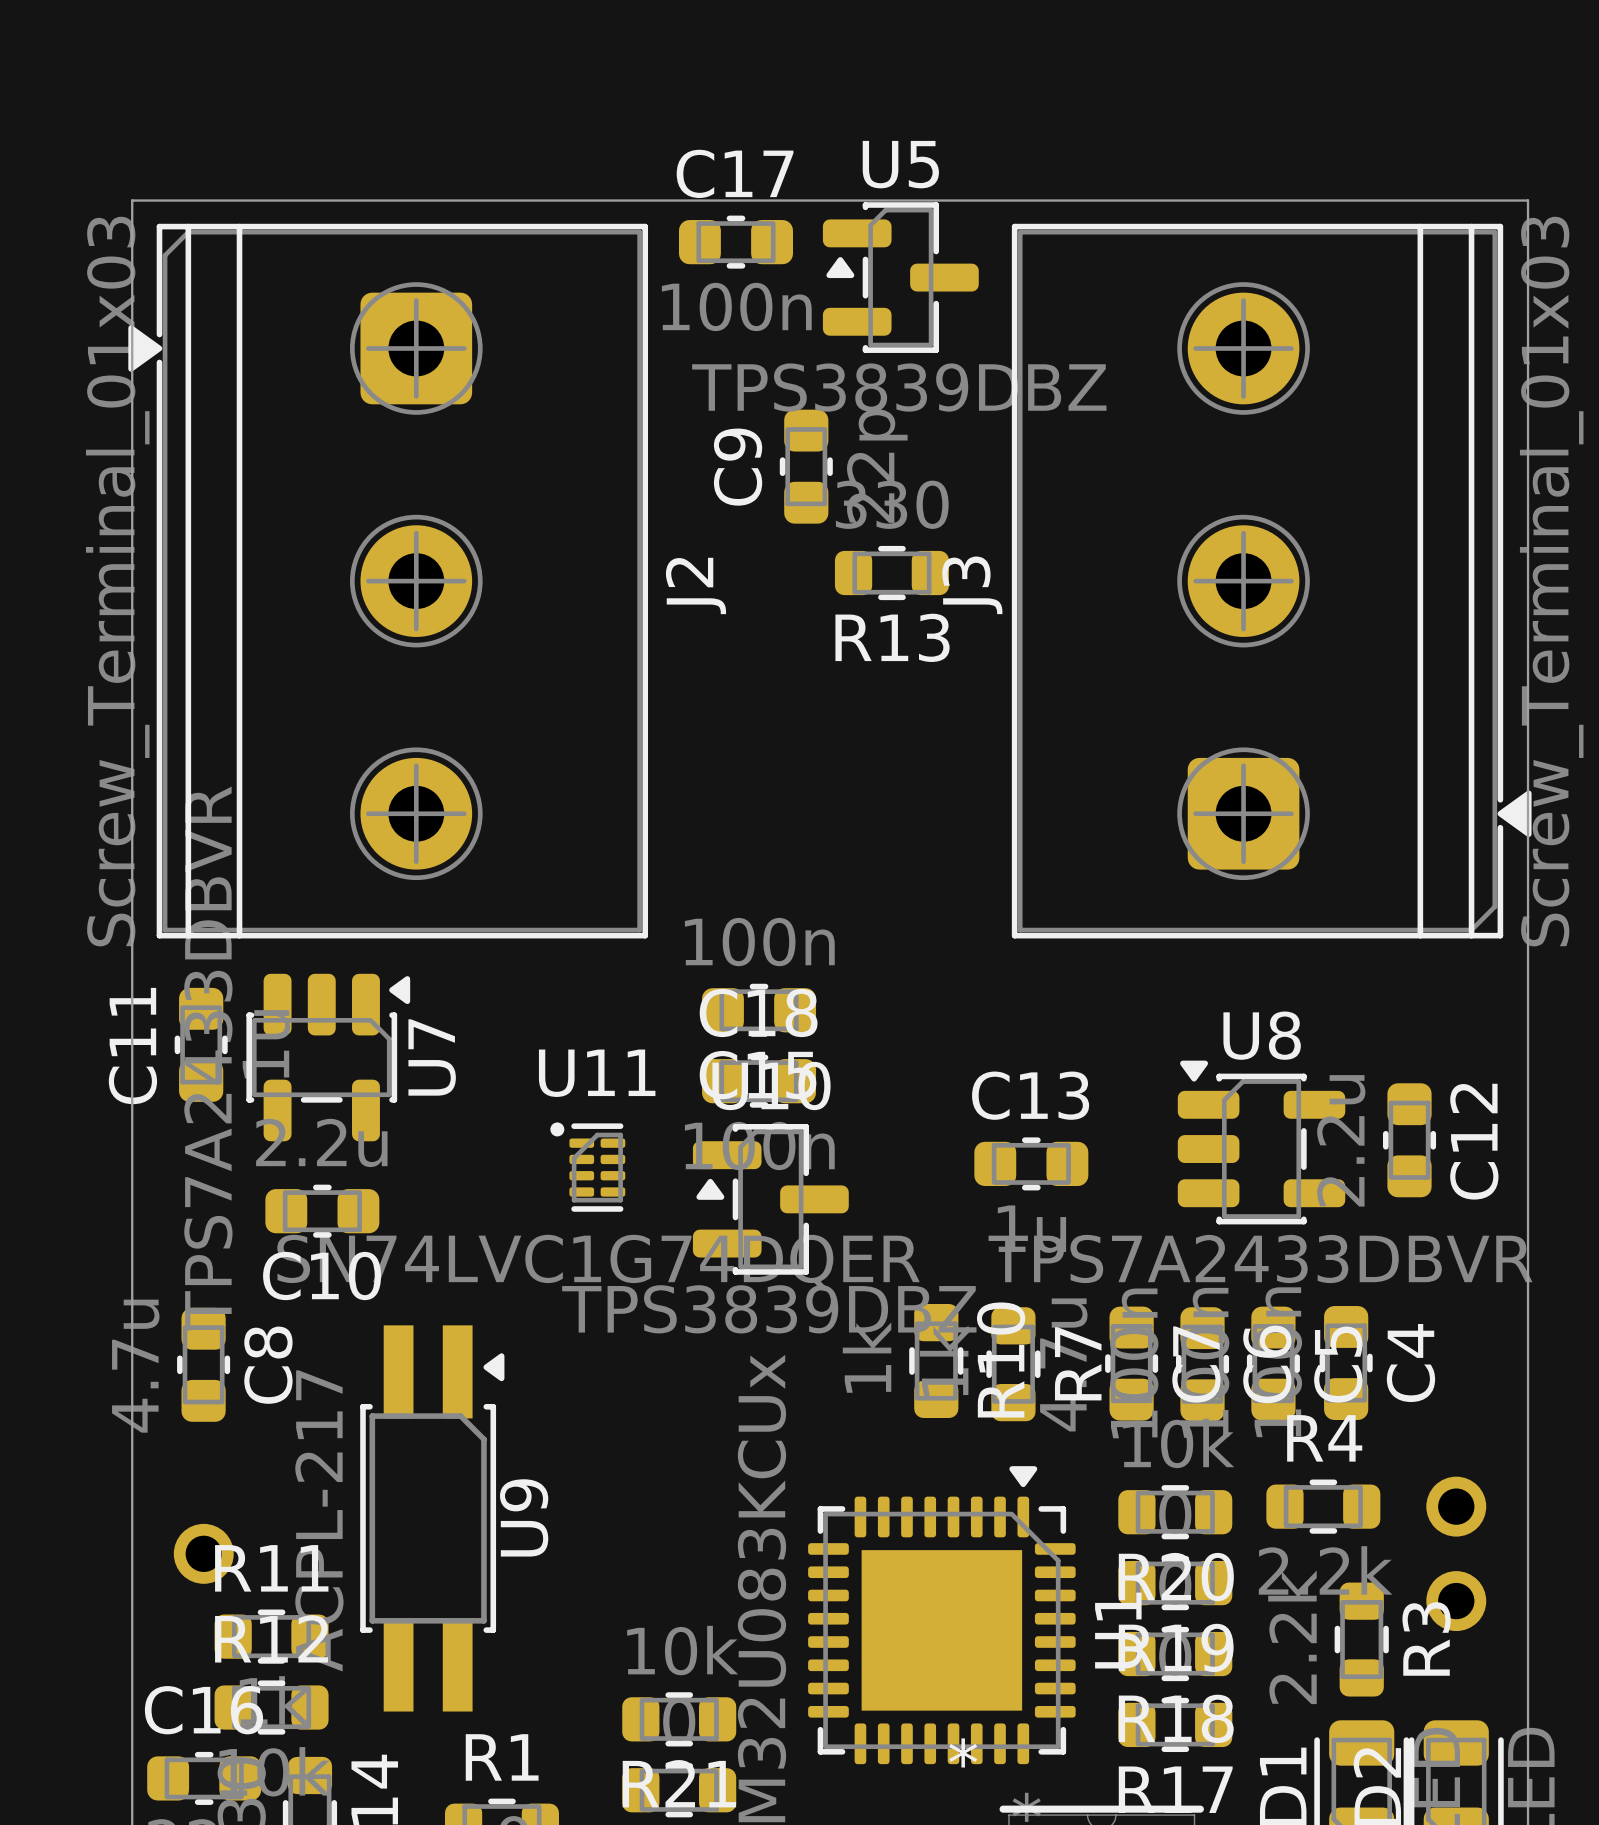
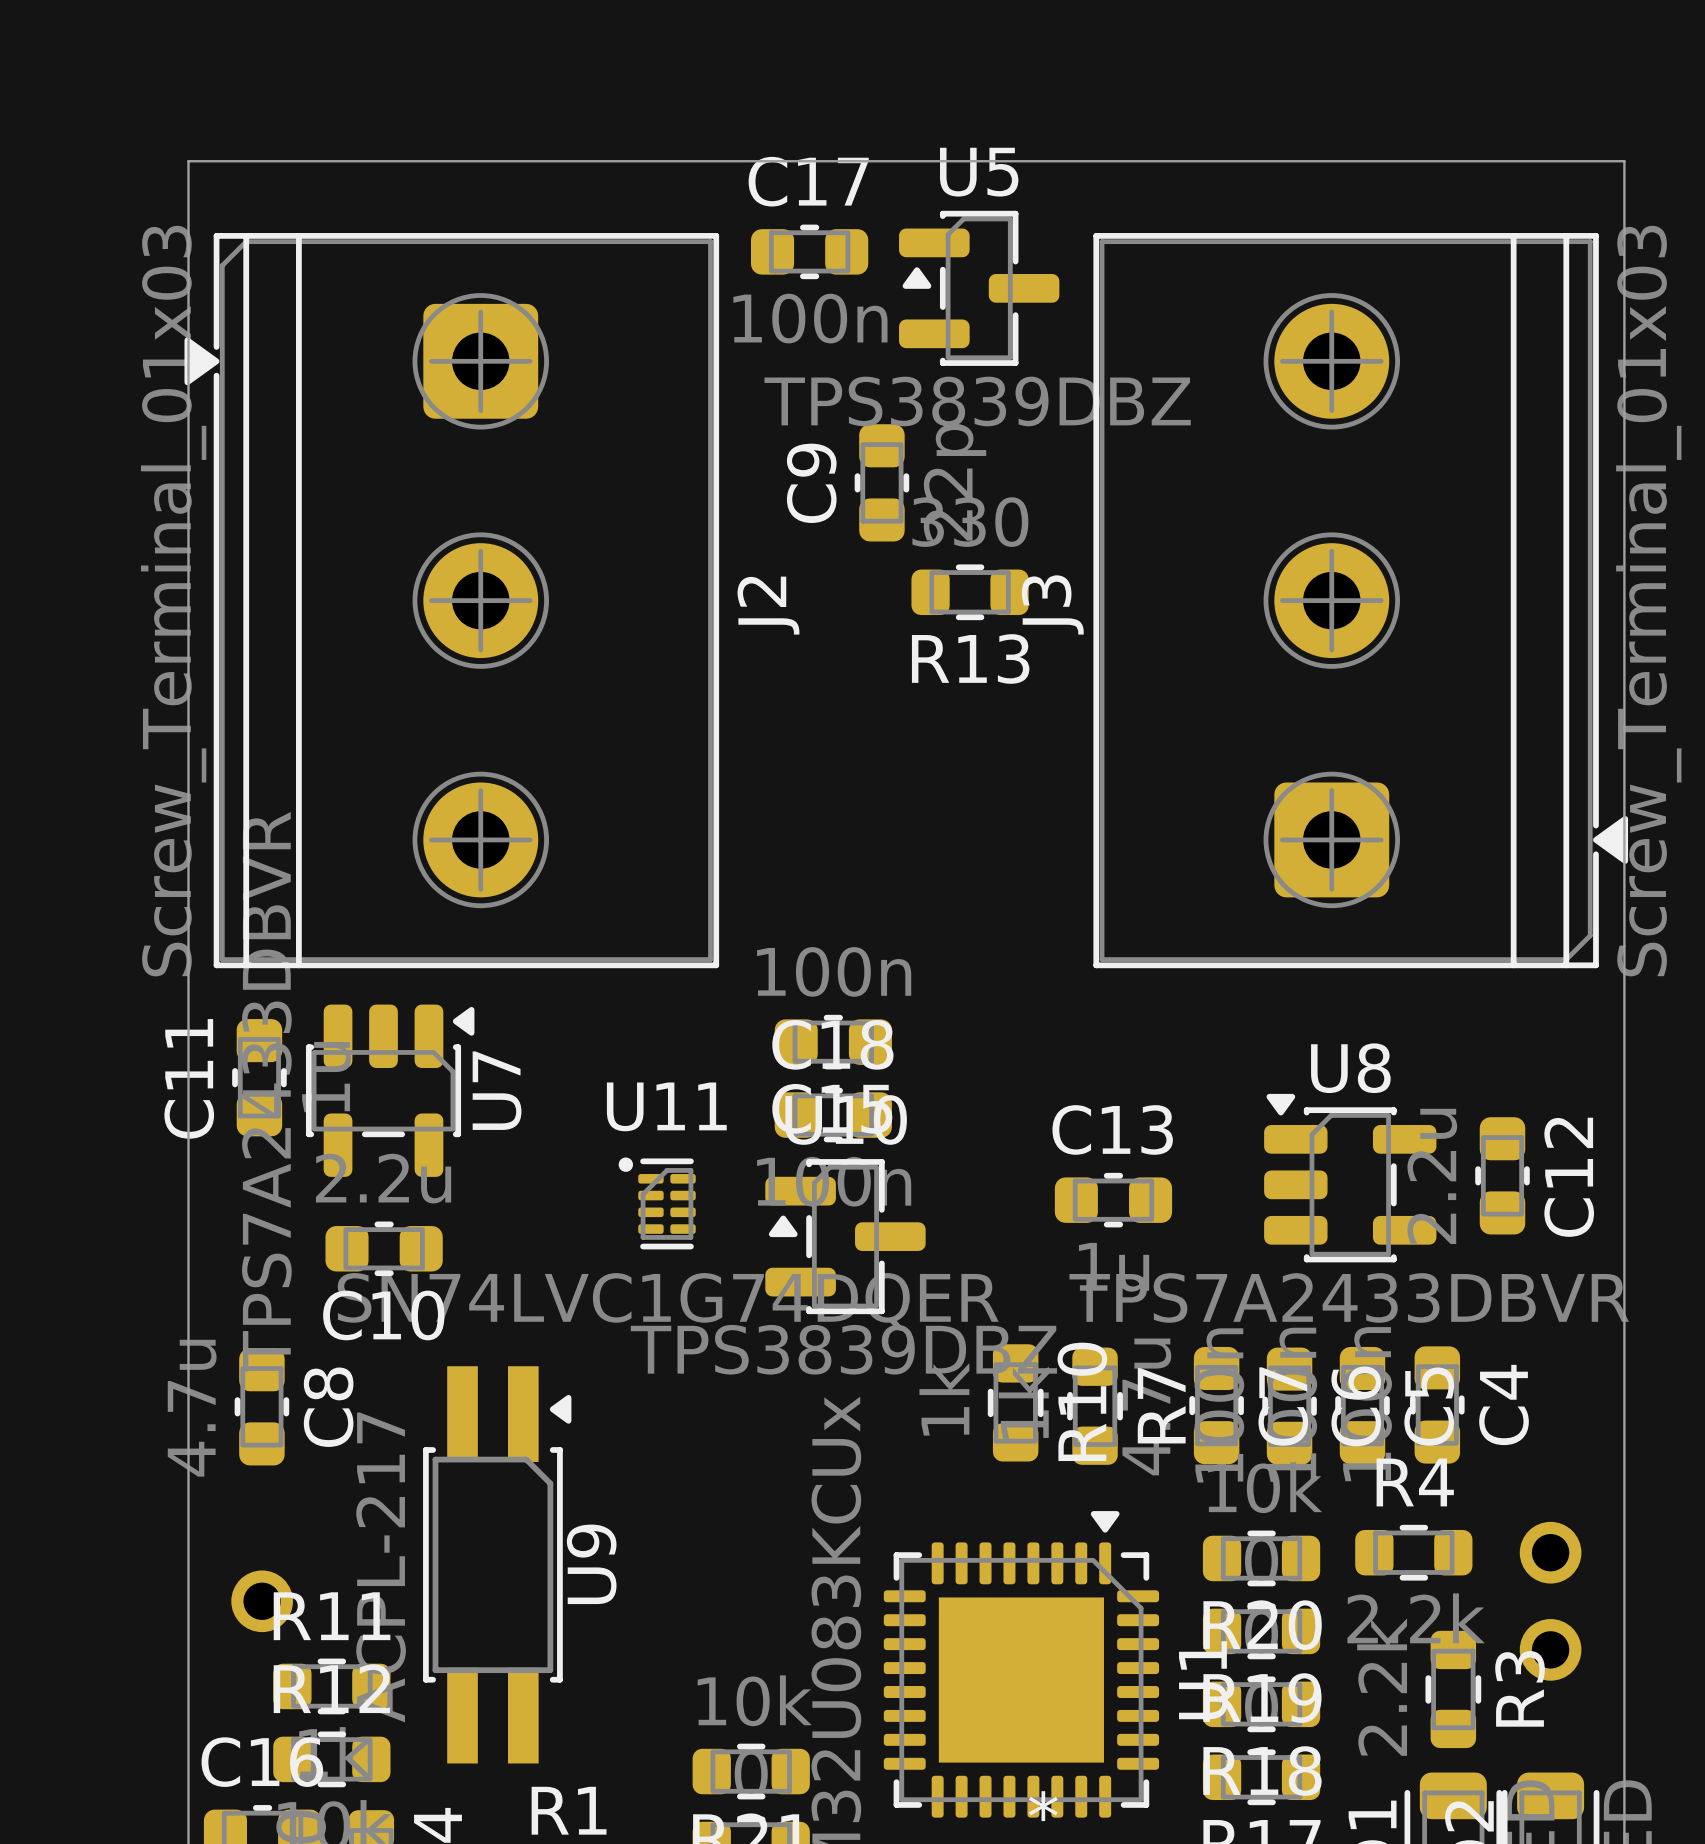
board edge: (132, 200) (1528, 200) -> (188, 209) (188, 161) (1624, 161) (1624, 209)

